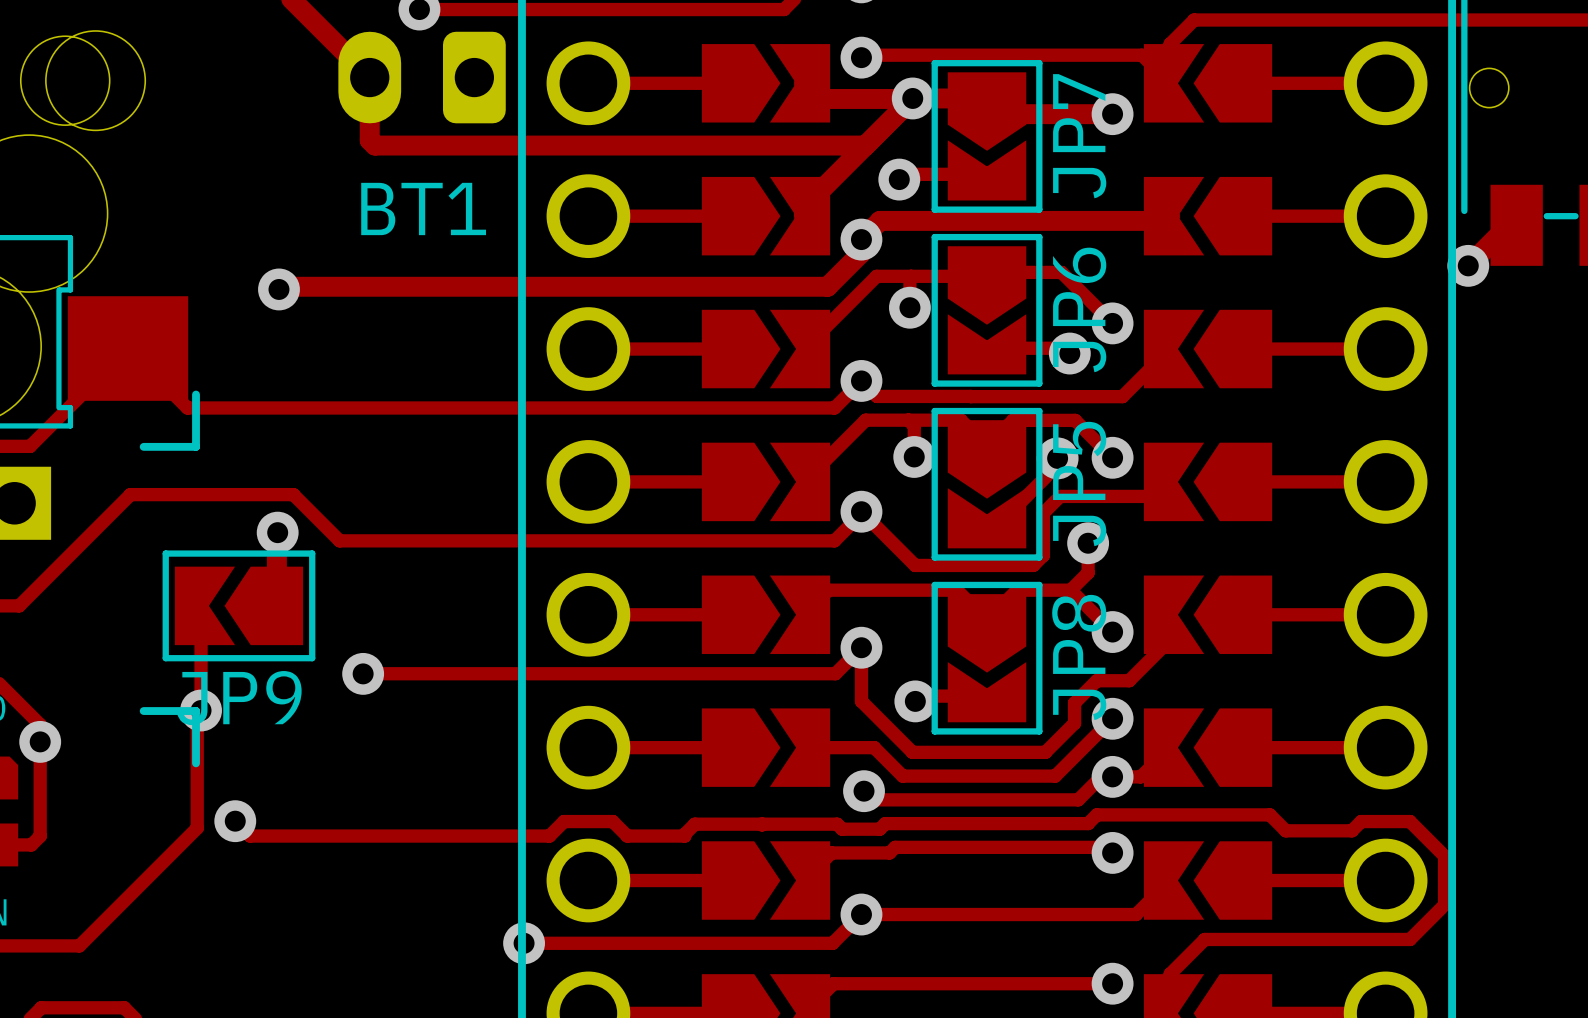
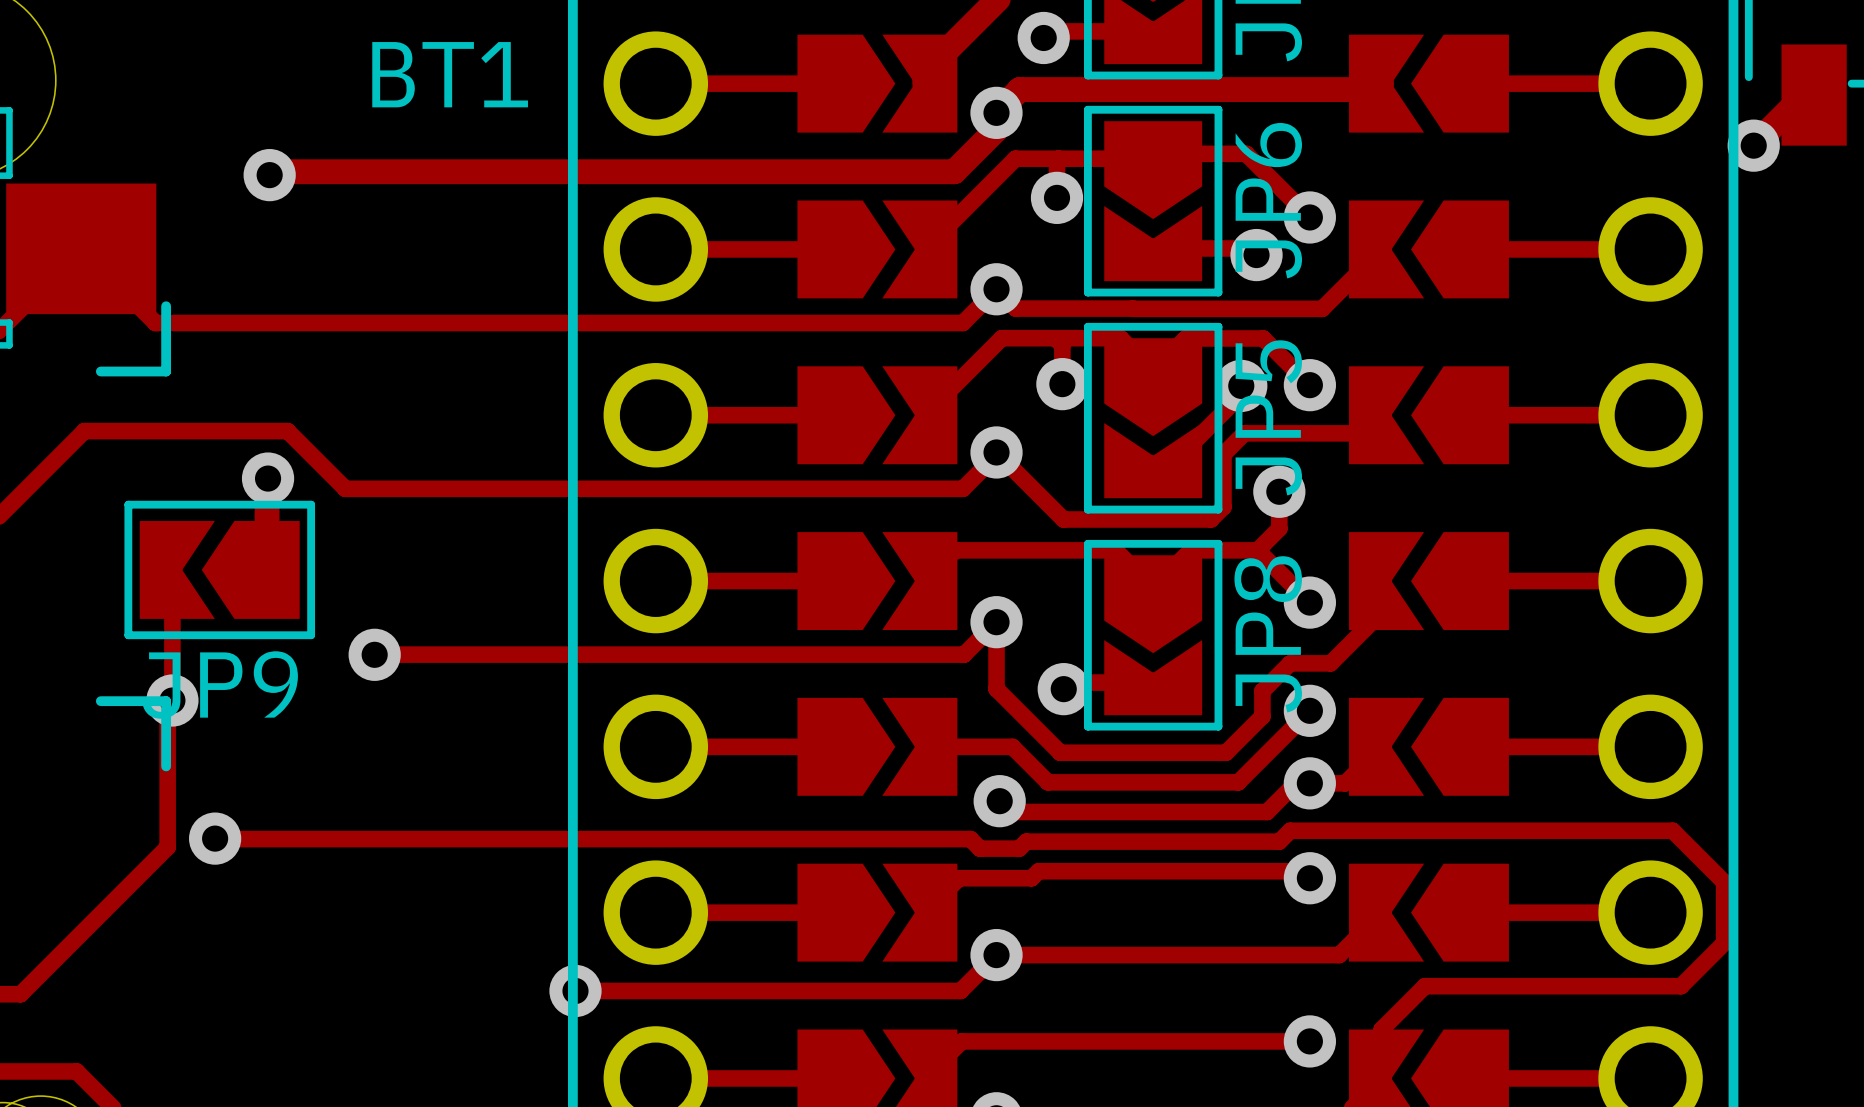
track: (1269, 814) (1285, 830) (1351, 830) (1361, 821) (1410, 821) -> (1506, 830) (1672, 830) (1681, 839)
track: (235, 821) (250, 836) (549, 836) (563, 821) -> (215, 835) (218, 839) (625, 839)
track: (612, 821) (627, 836) (684, 836) (694, 824) (837, 824) (842, 829) (848, 829) -> (686, 839) (970, 839) (980, 848)

